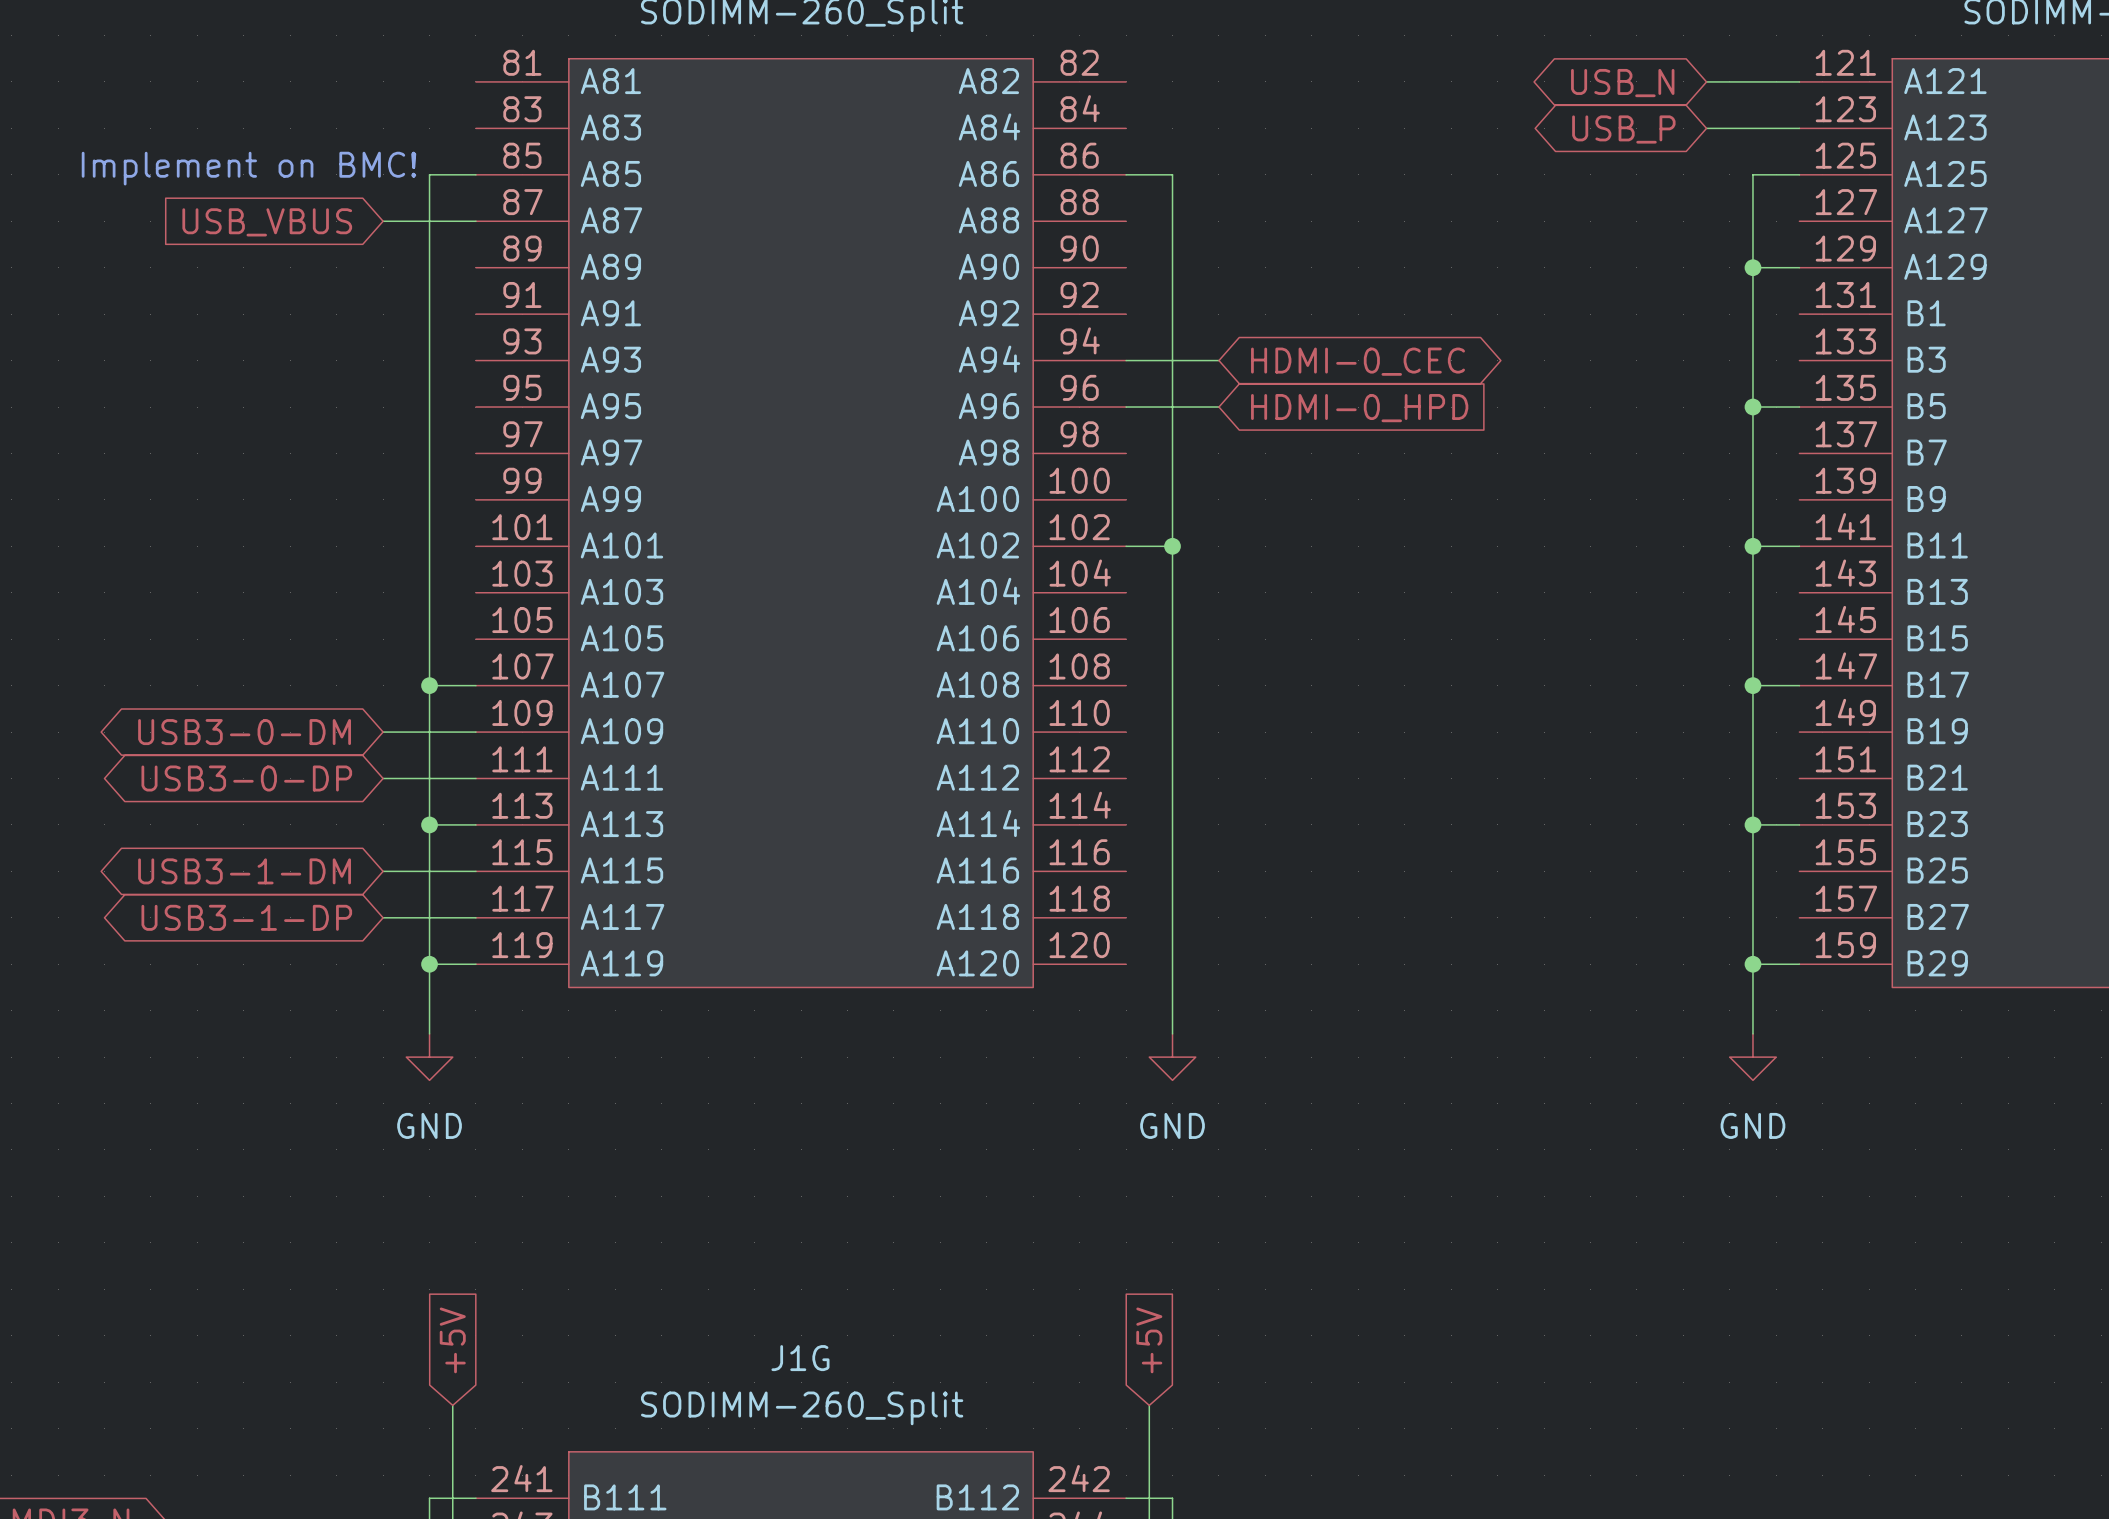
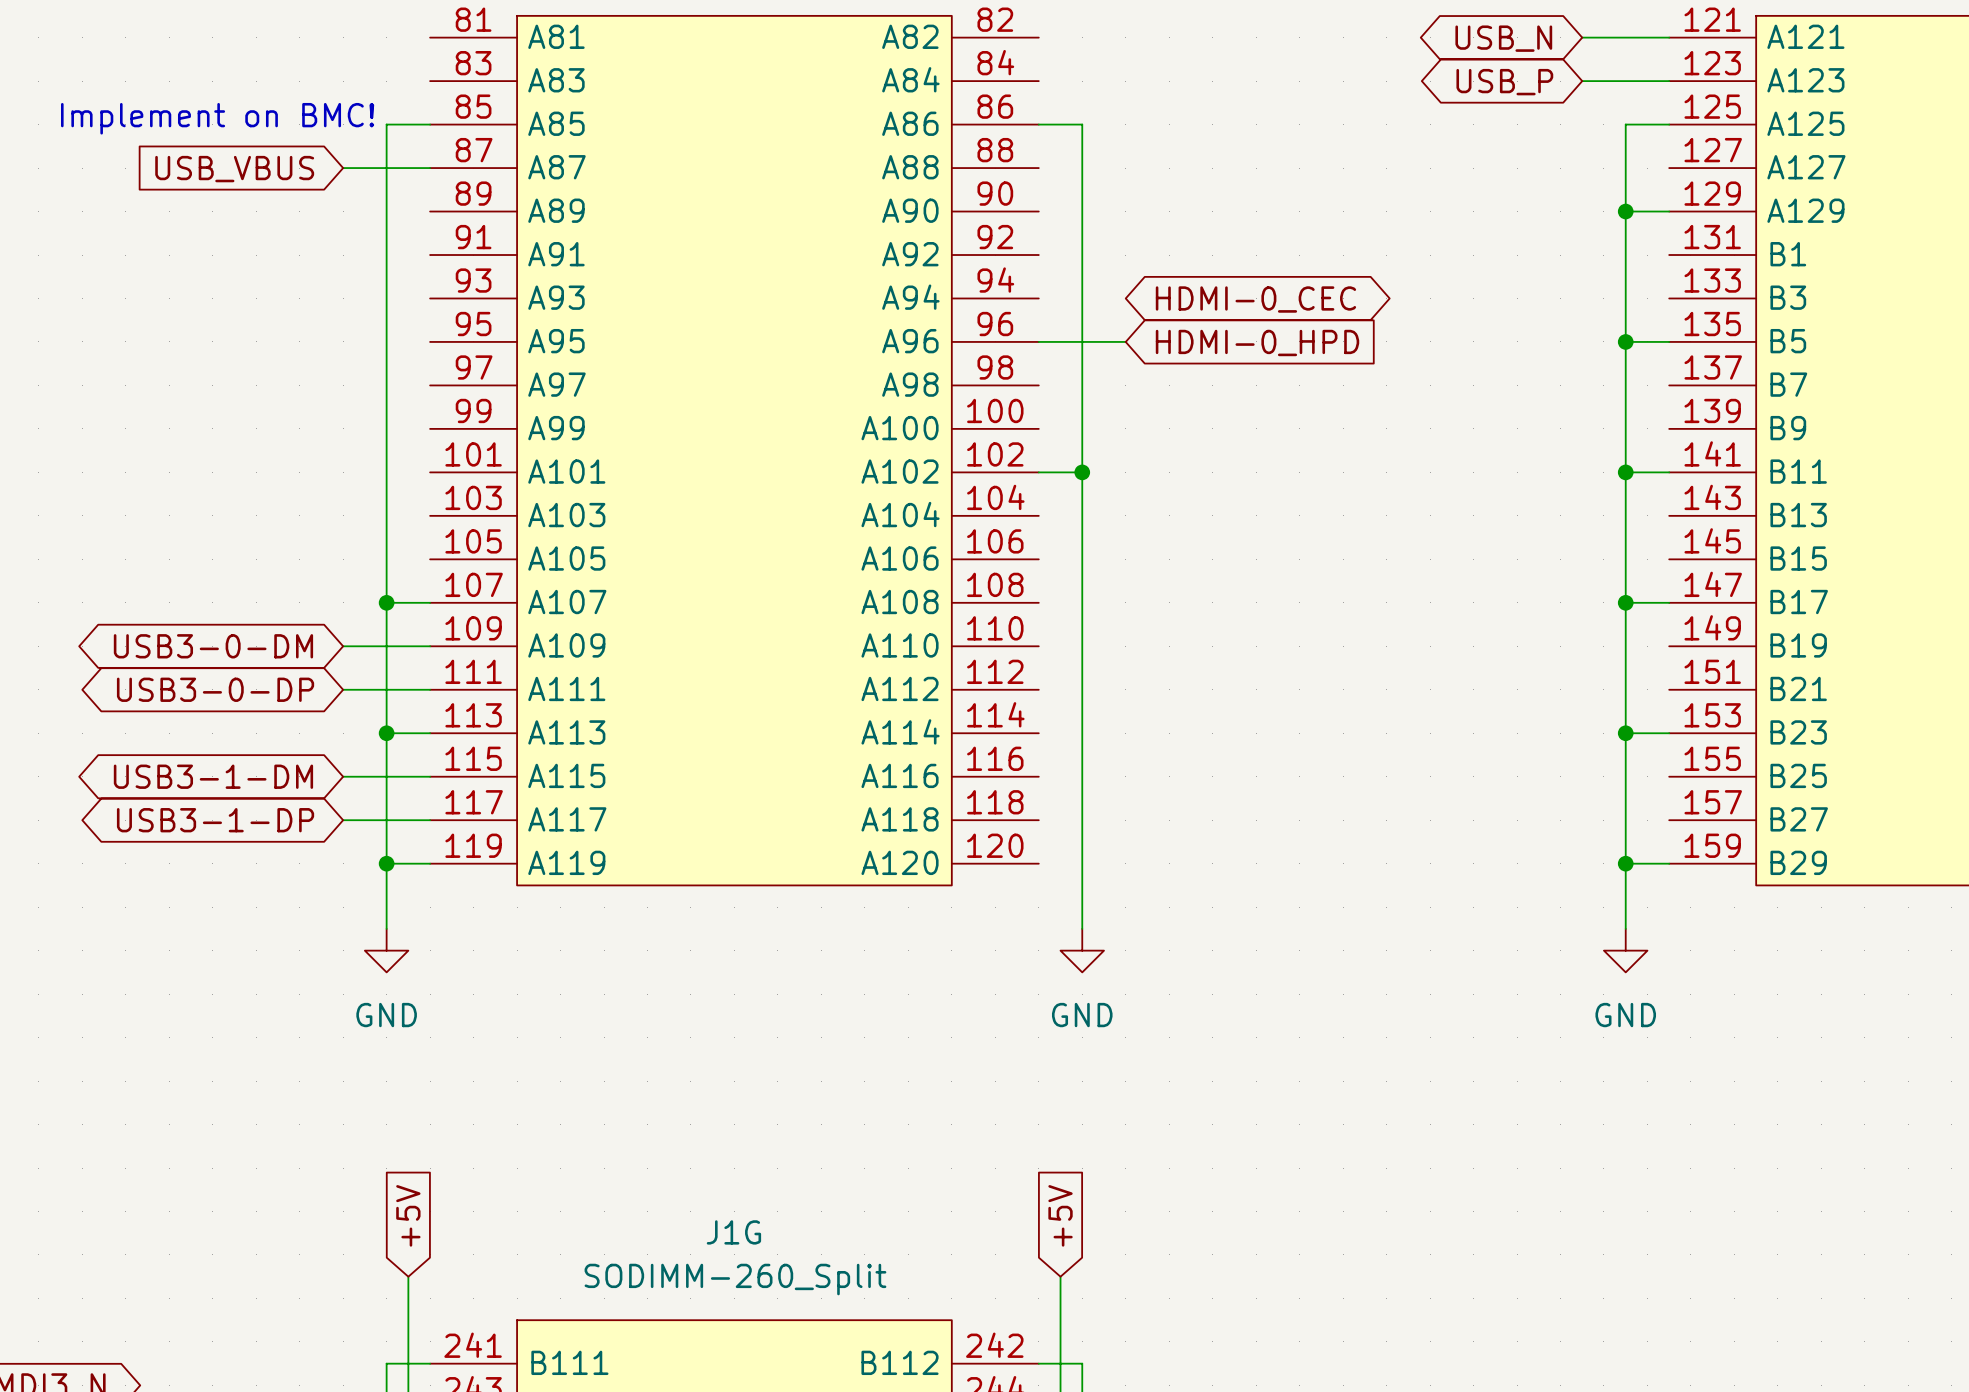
wire: (1126, 360) (1218, 360) -> none

